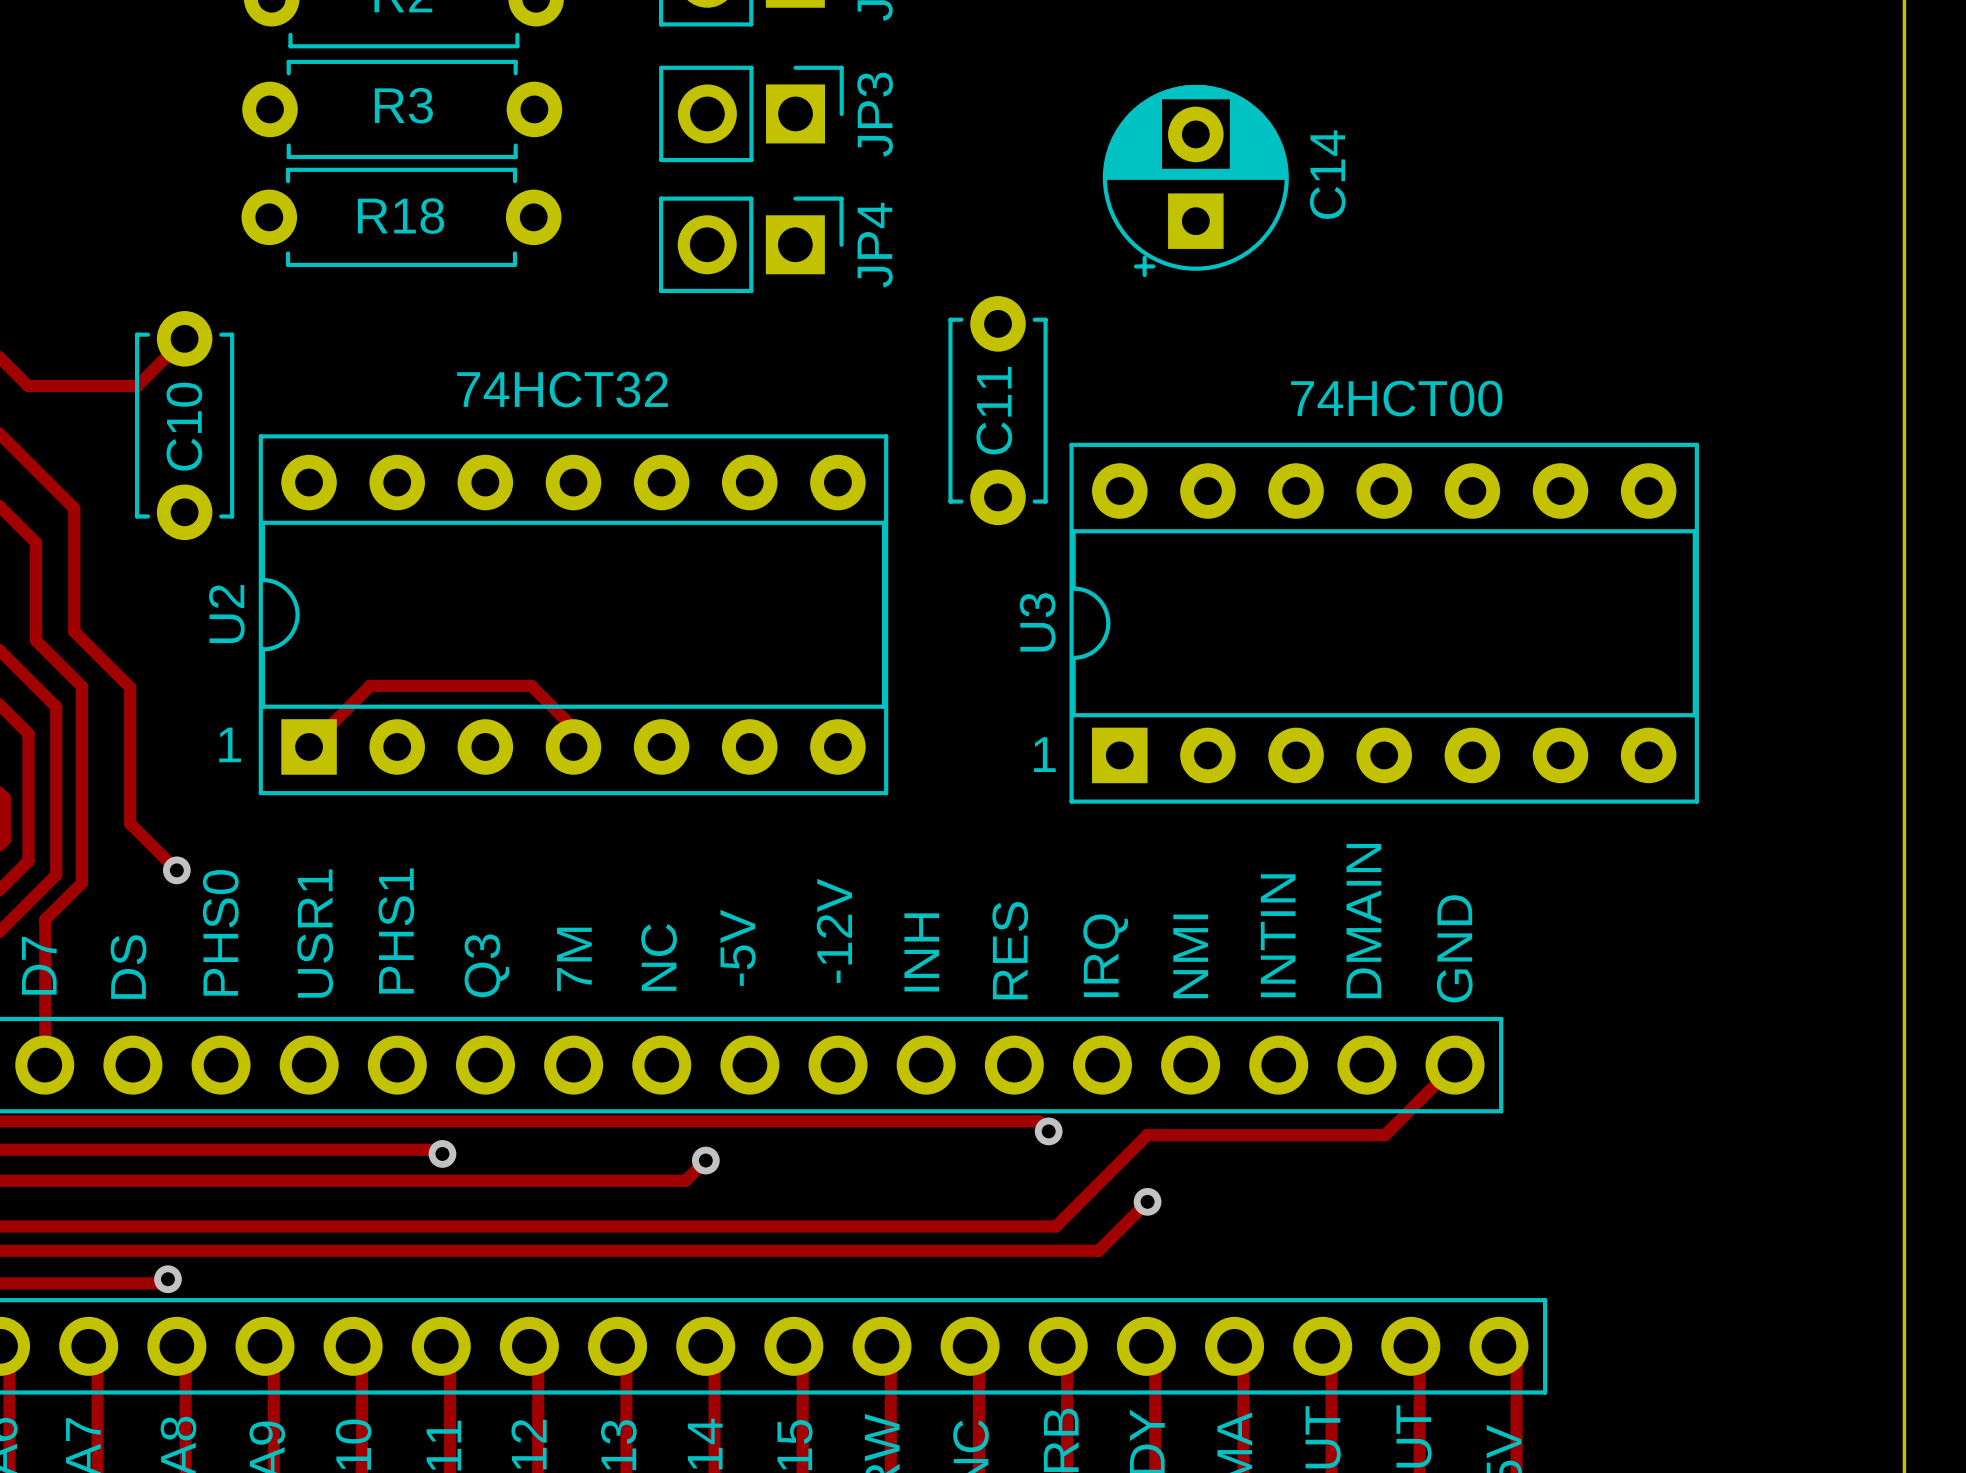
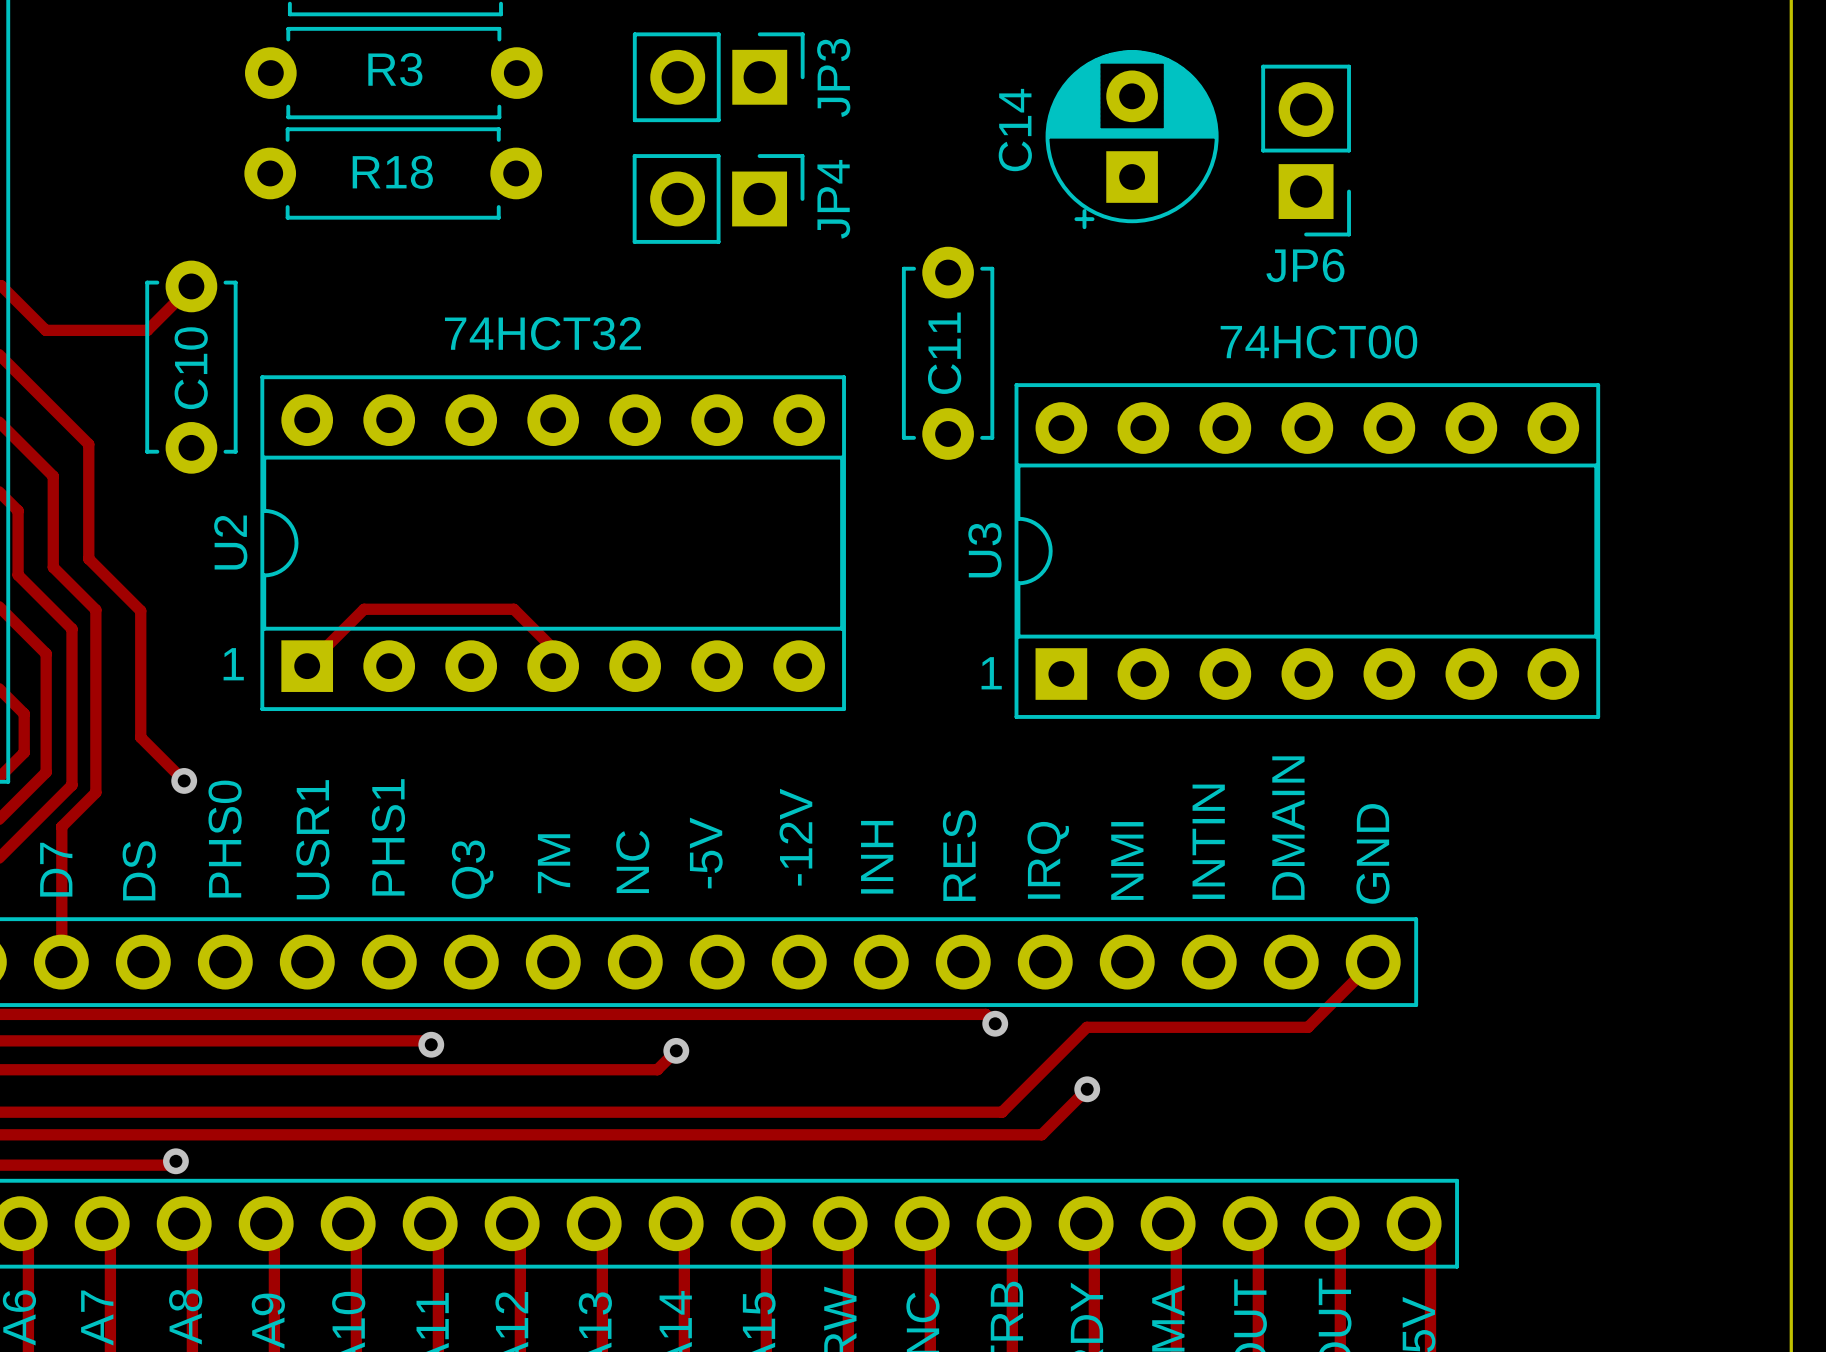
C14 name position: C14 (1327, 174) -> C14 (1015, 130)
JP6: none -> (1306, 150)

